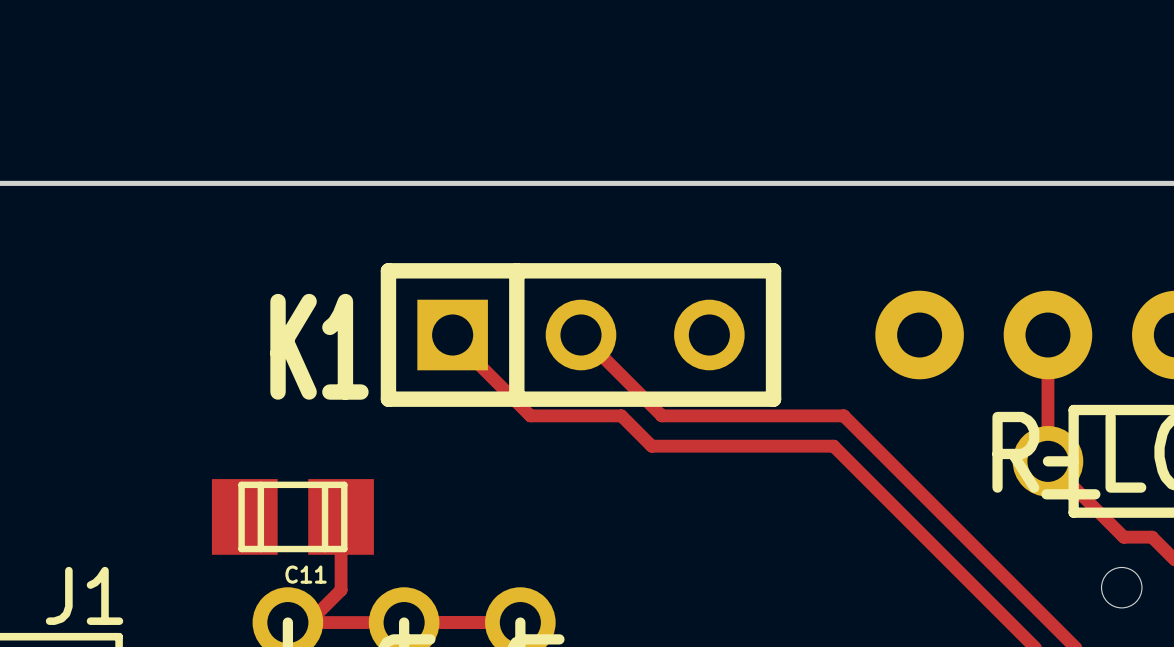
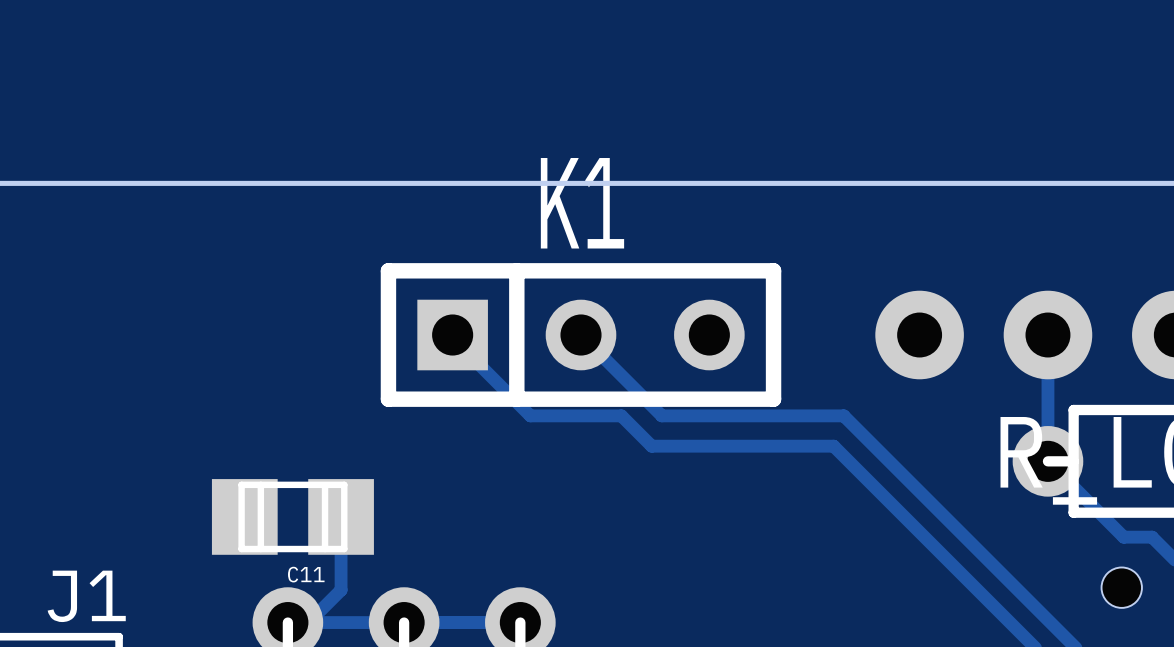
K1 name position: K1 (319, 346) -> K1 (582, 203)

